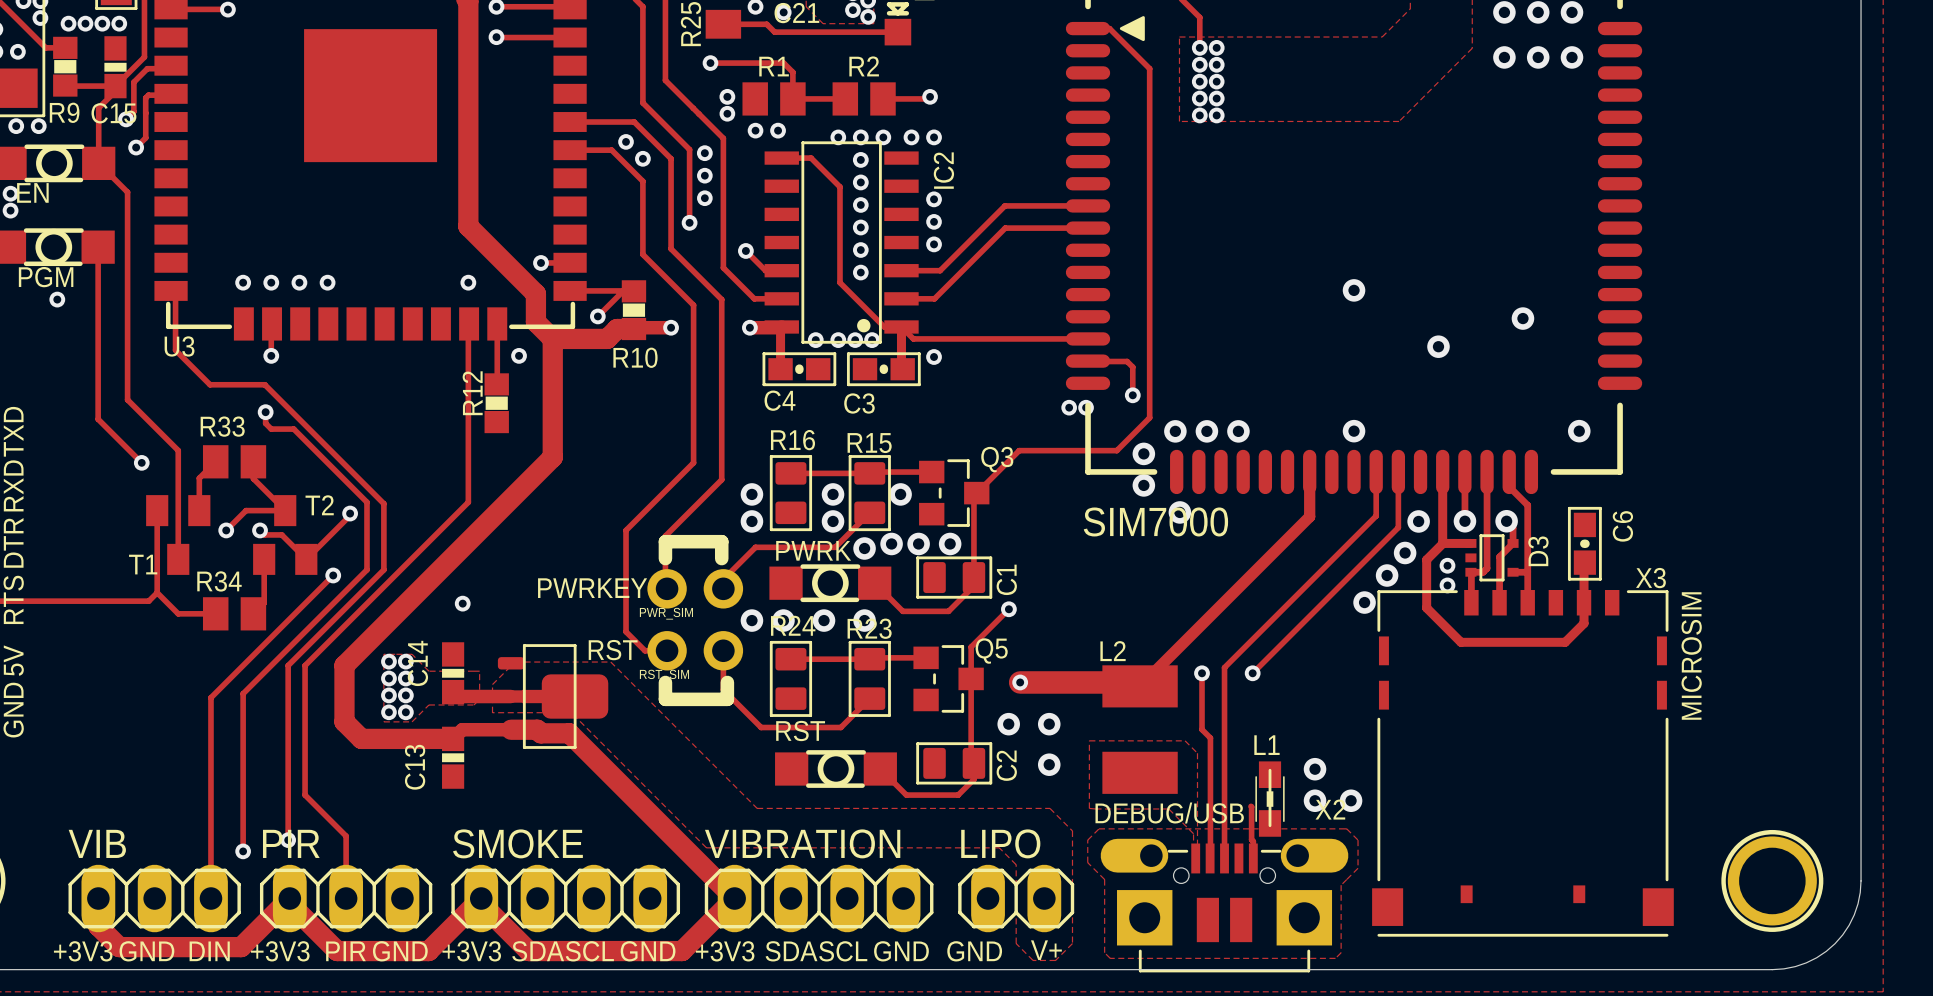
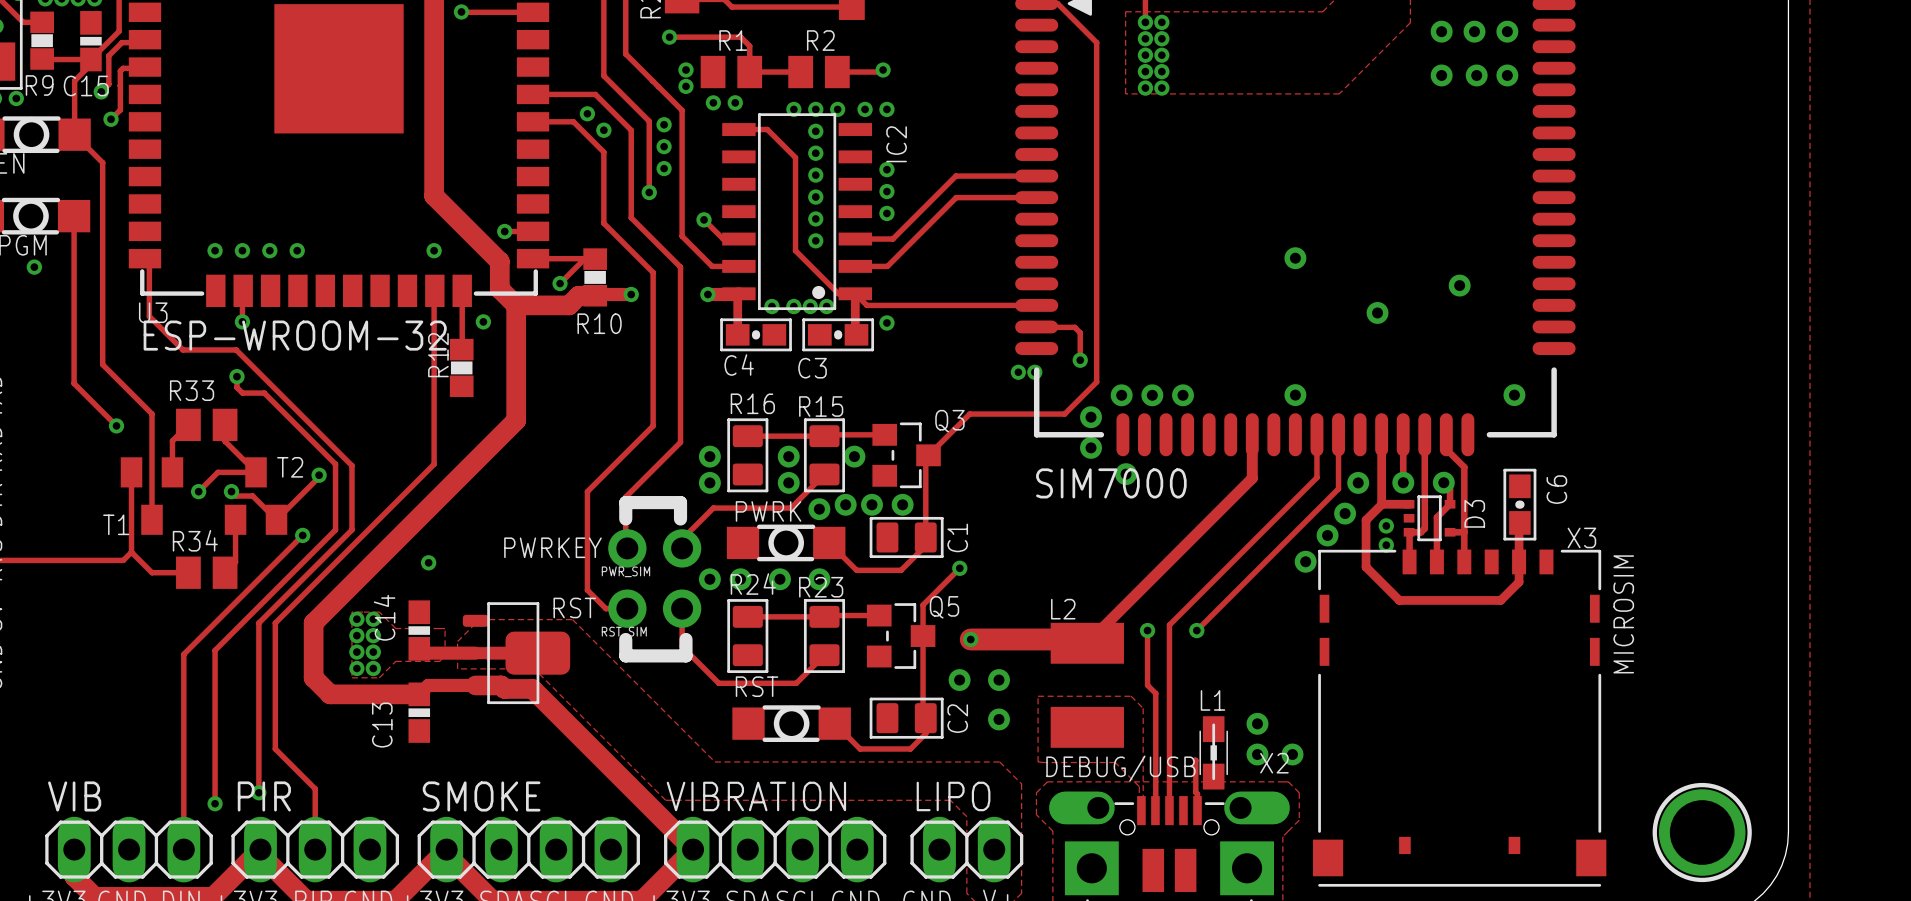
via: none -> (1441, 75)
via: none -> (1476, 75)
via: none -> (1507, 75)
text: none -> ESP-WROOM-32 (295, 335)

